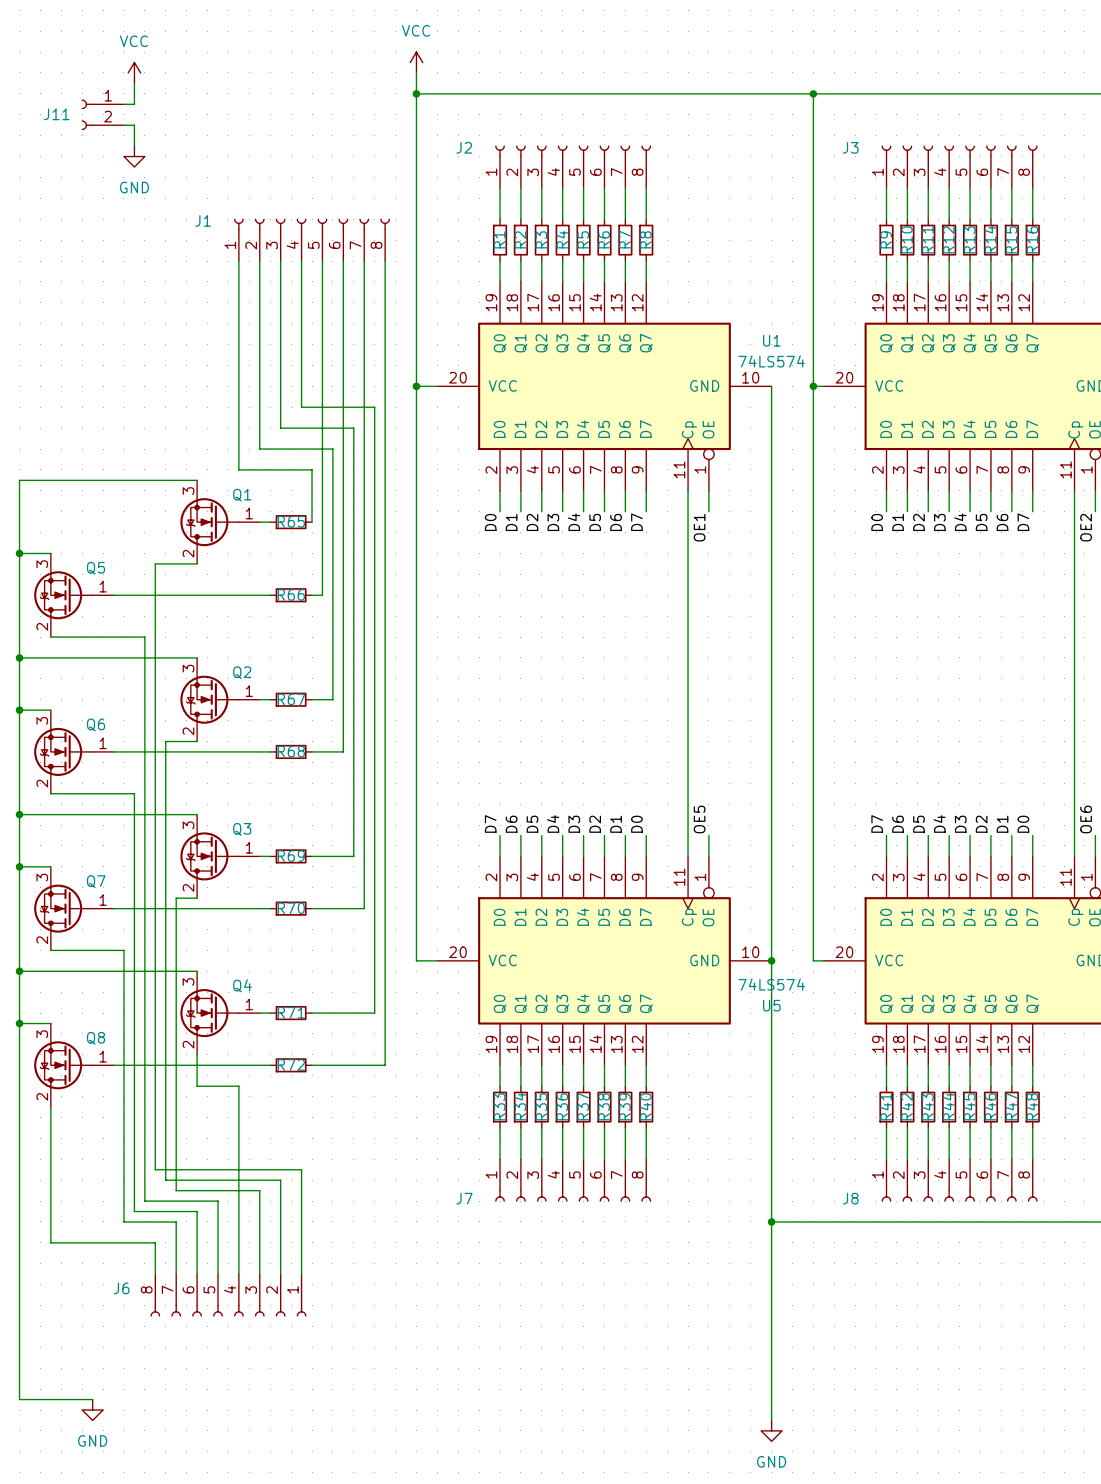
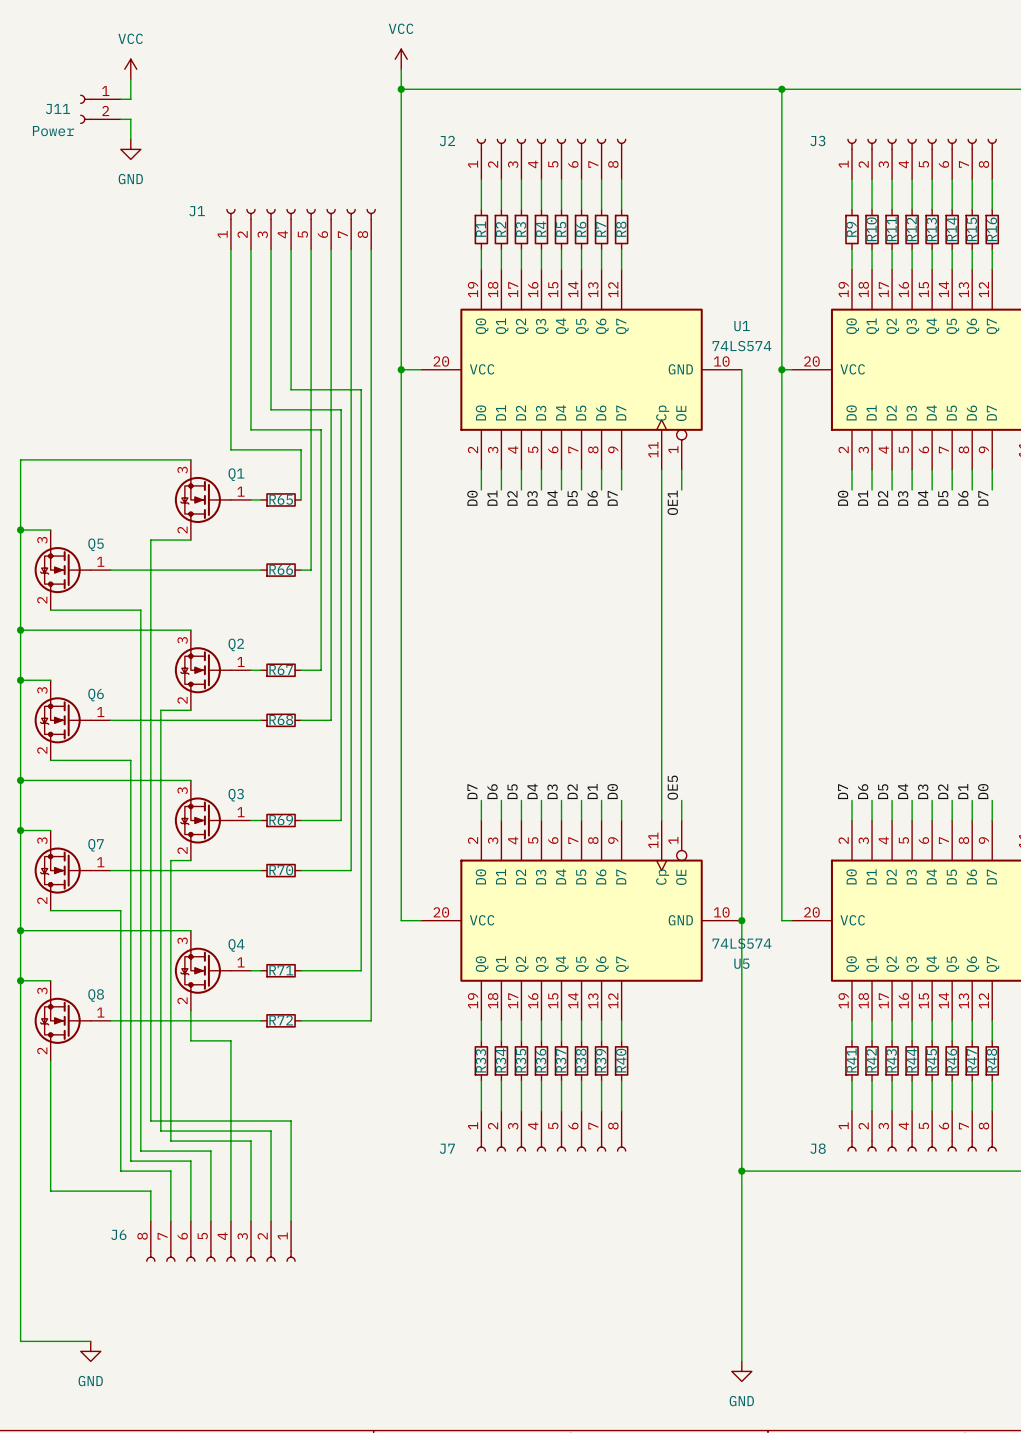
J11 value: none -> Power (53, 131)

